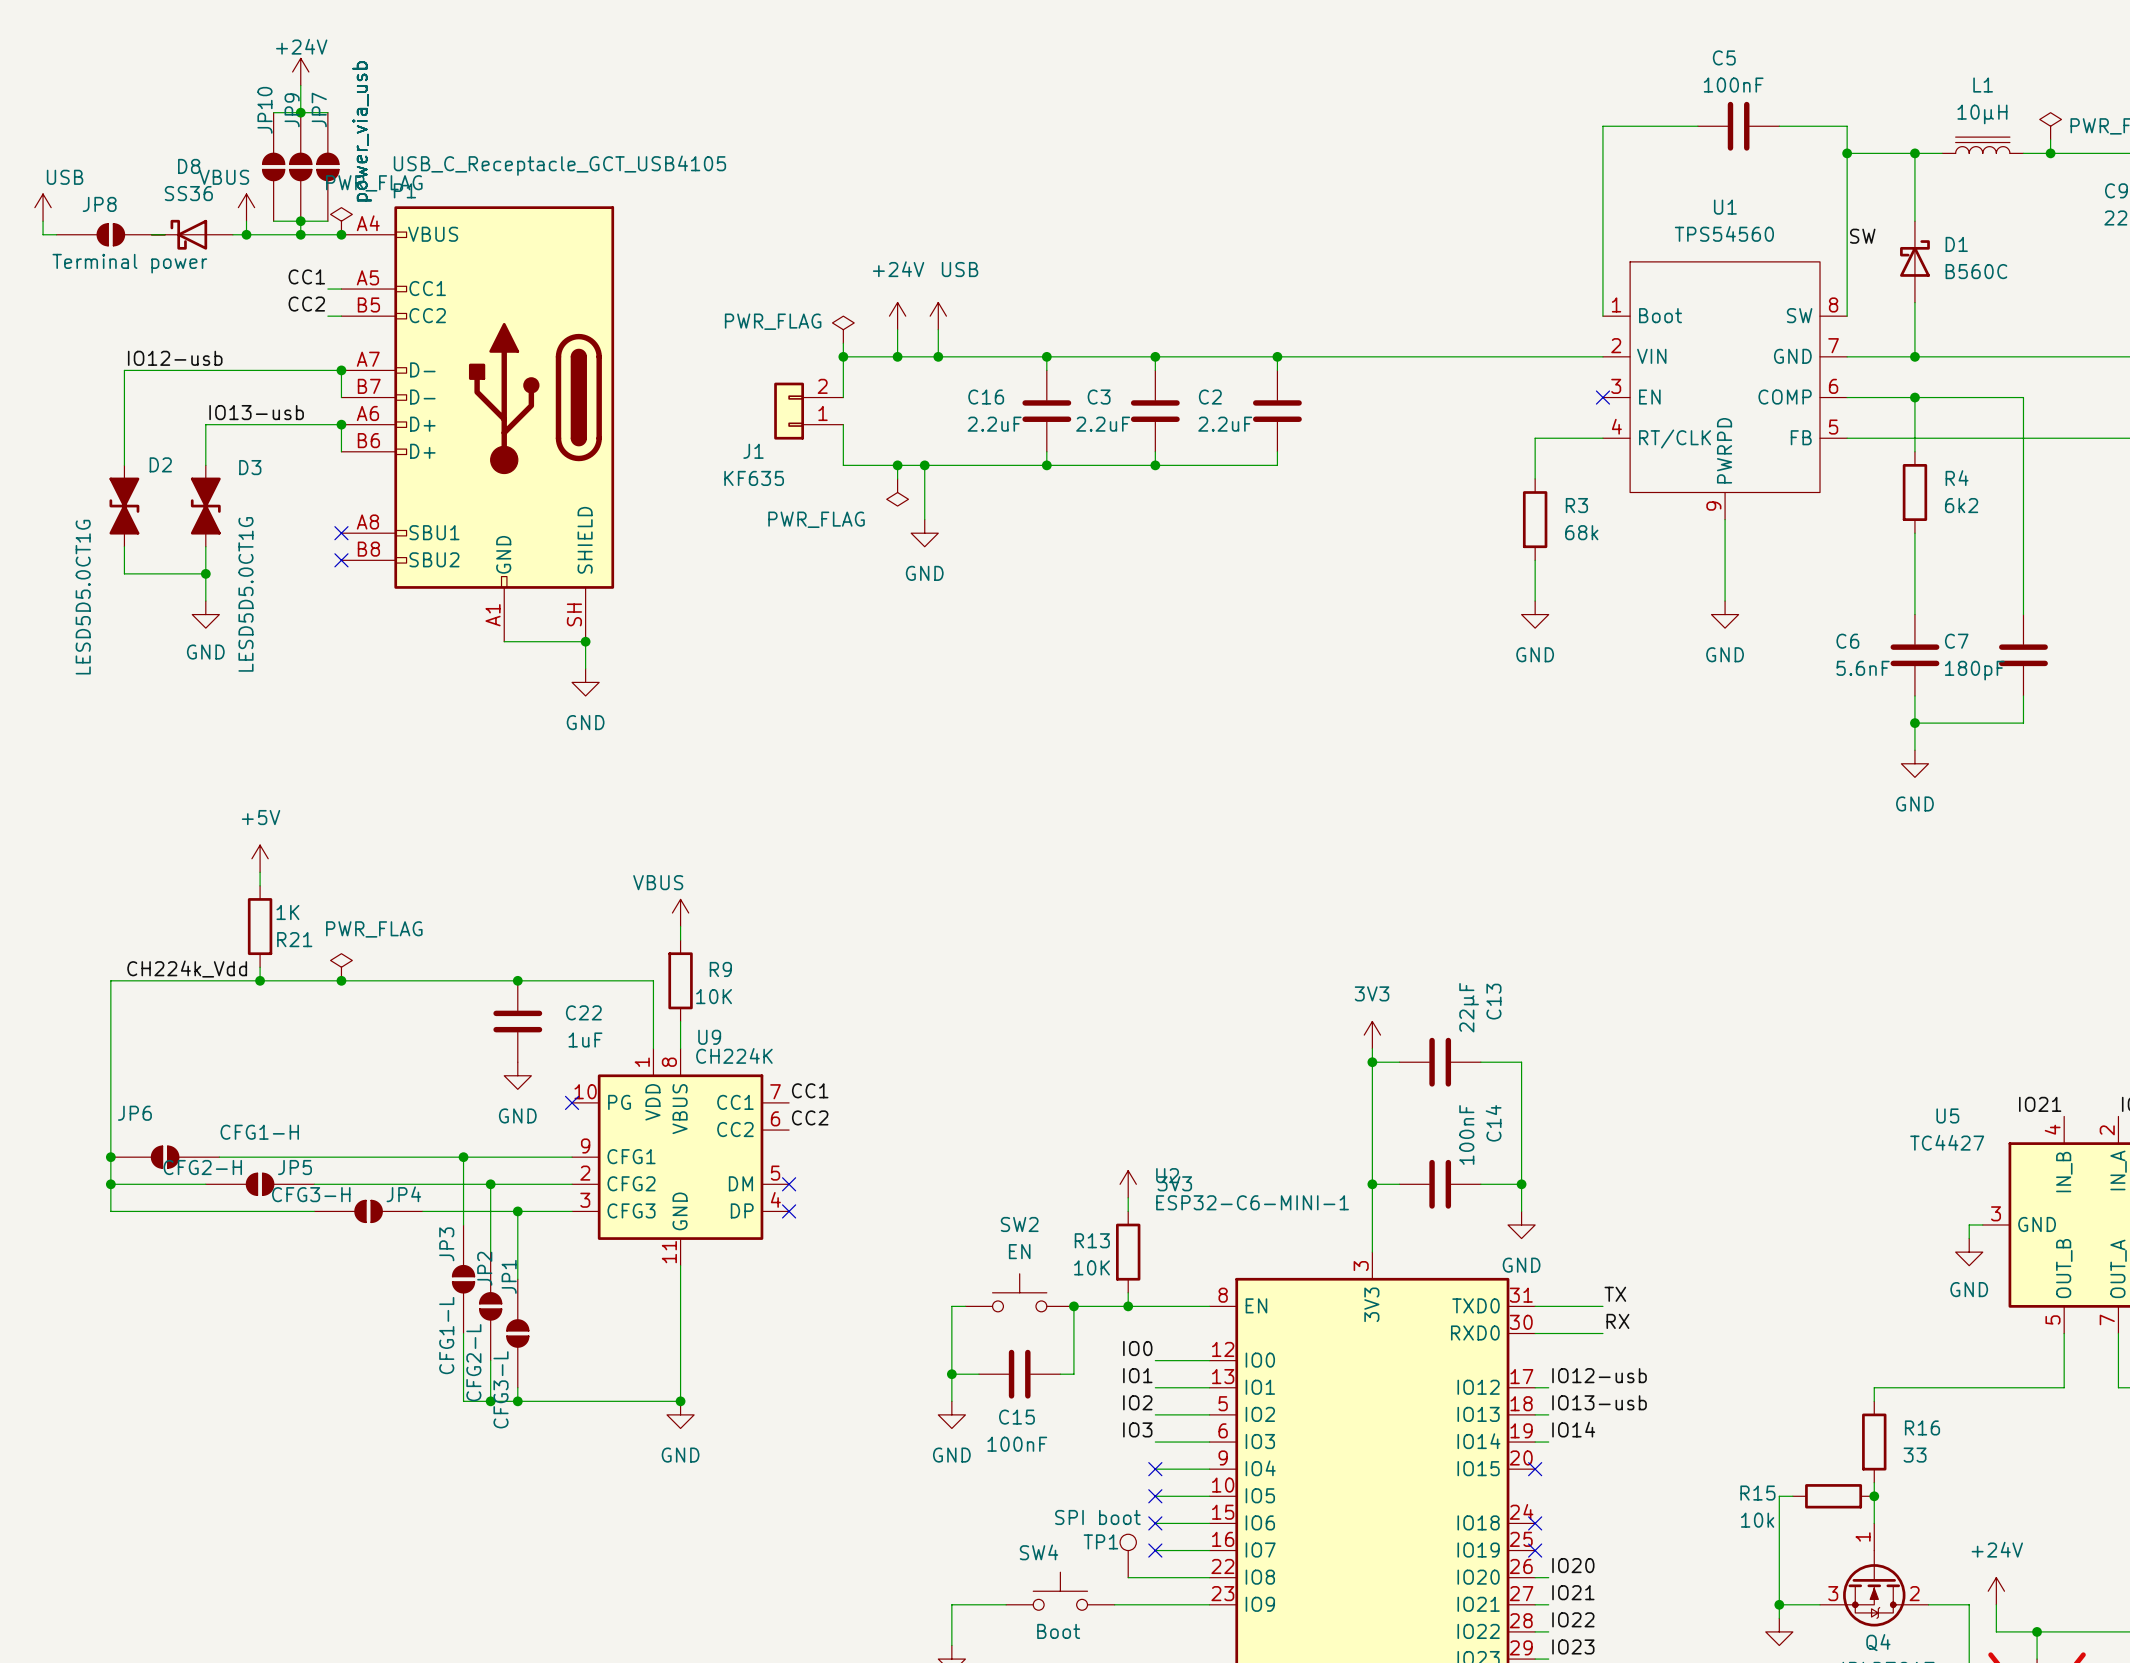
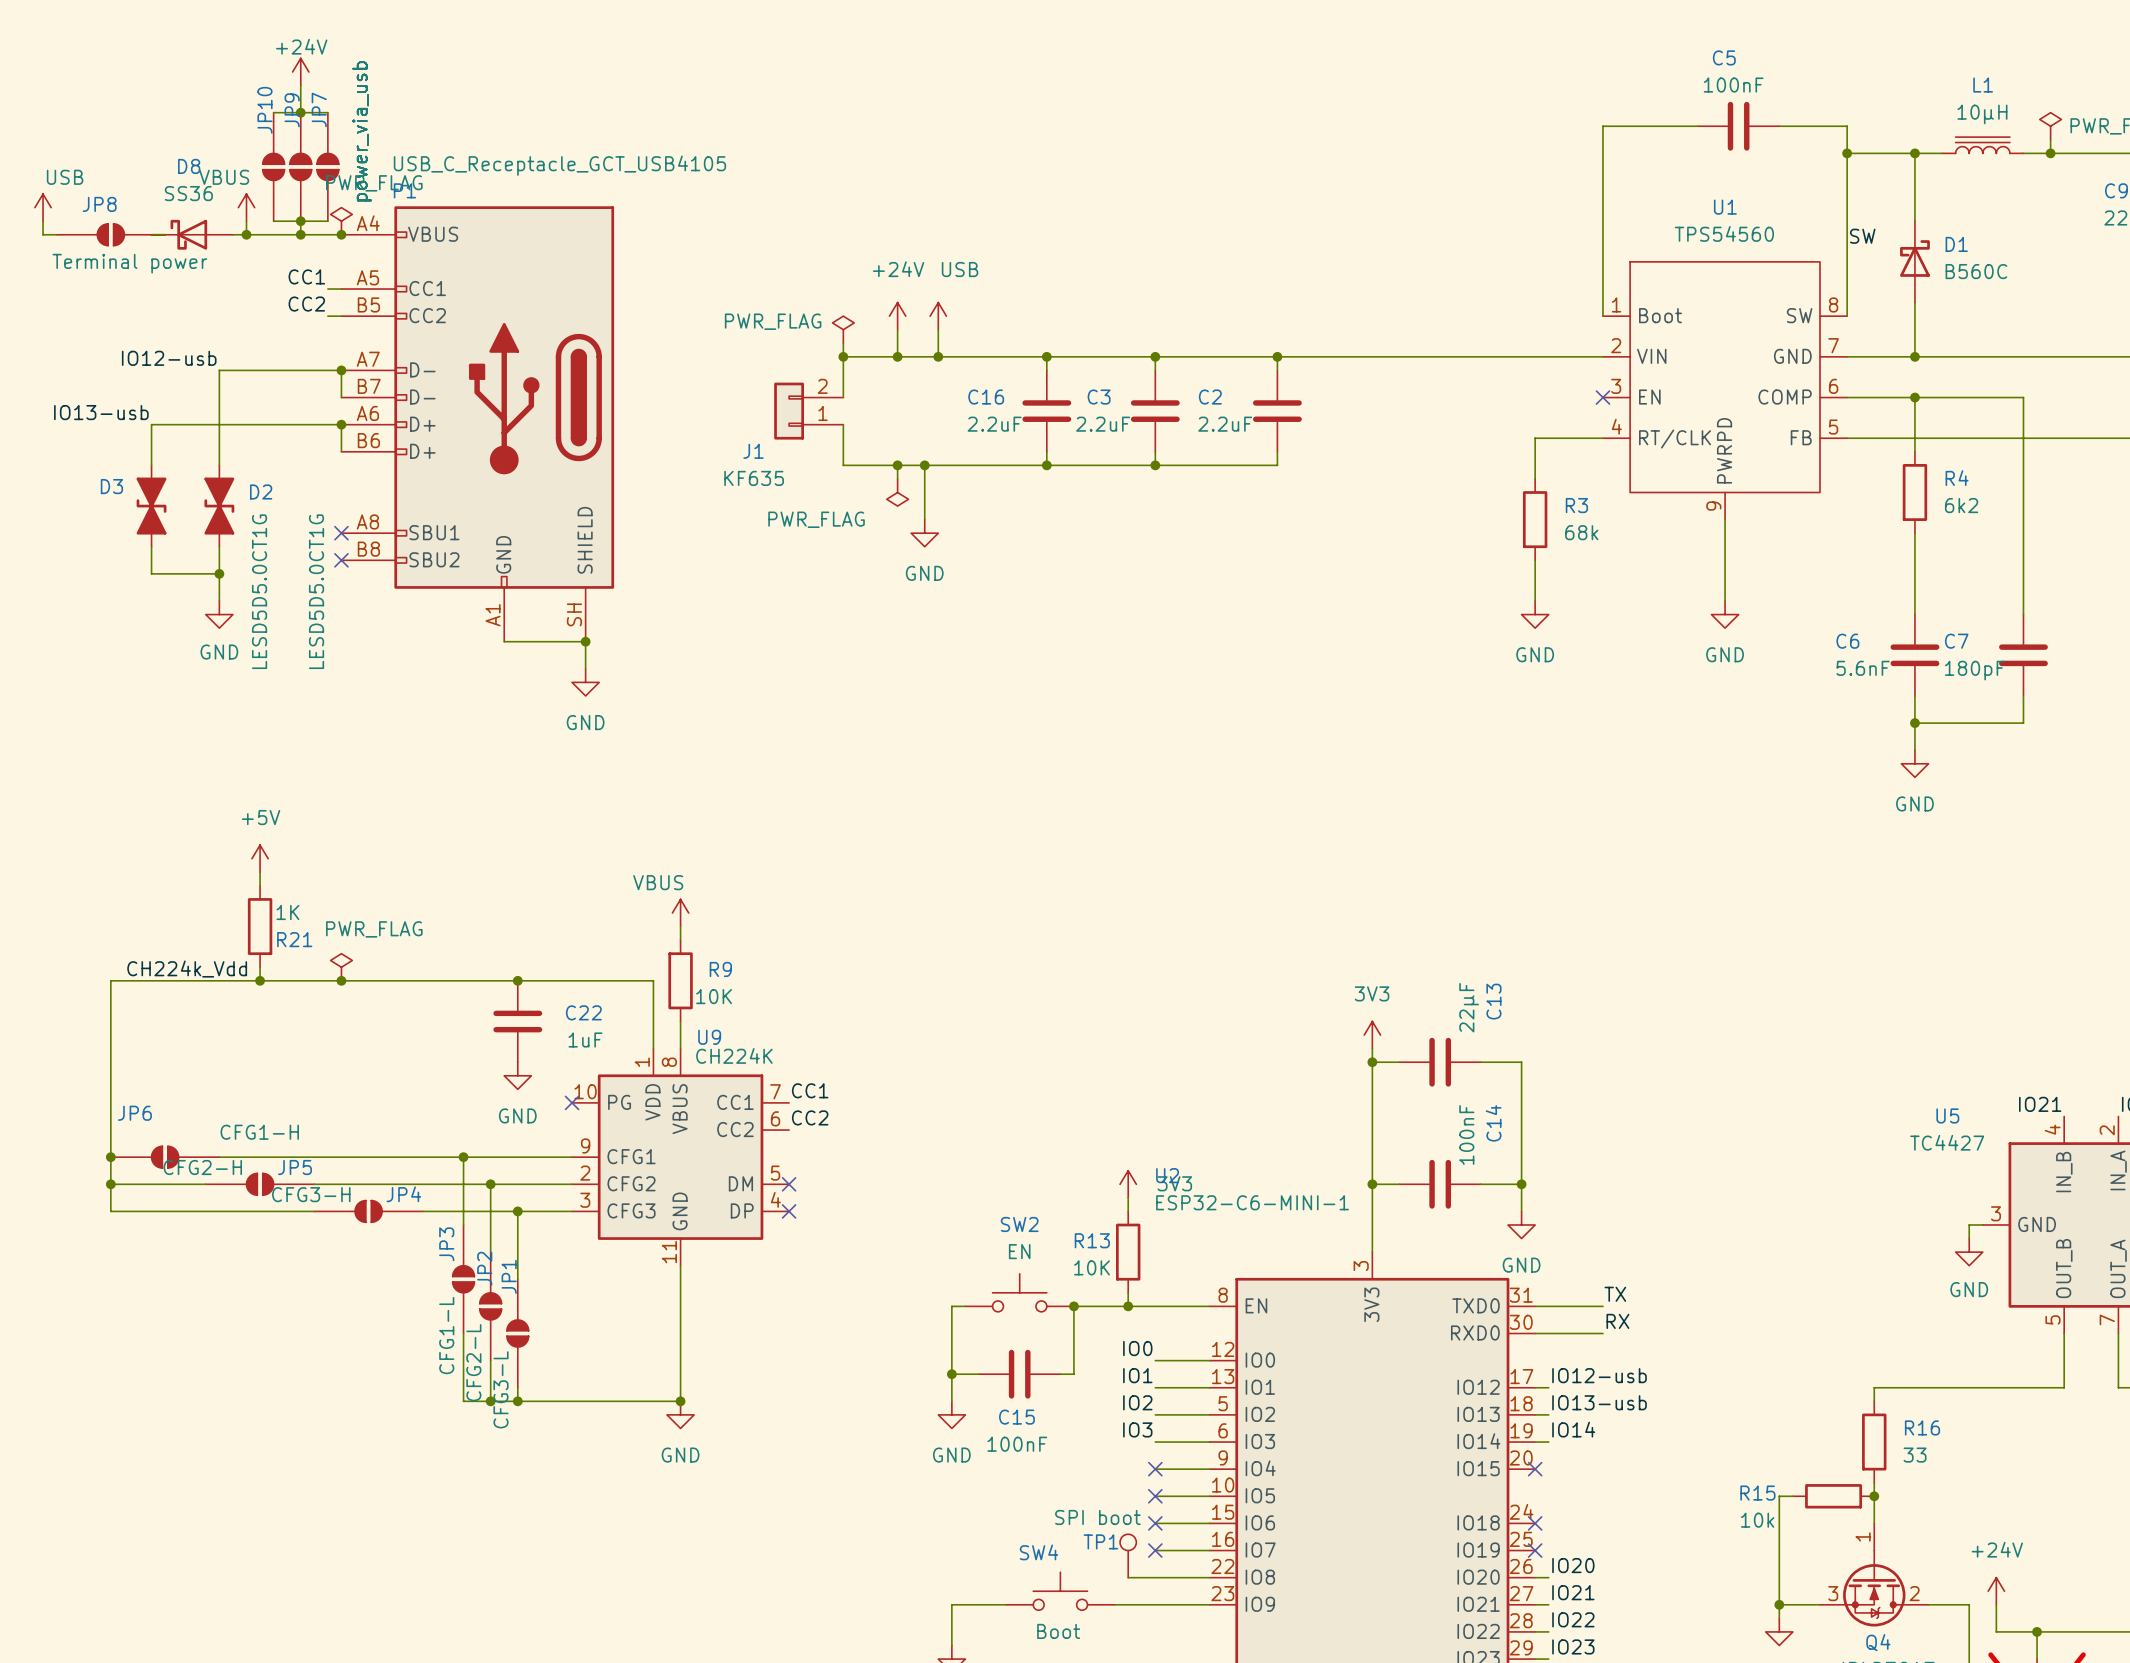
label position: IO12-usb (175, 358) -> IO12-usb (169, 358)
wire: (219, 370) (124, 370) (124, 465) -> (219, 370) (219, 465)
label position: IO13-usb (256, 412) -> IO13-usb (101, 412)
wire: (205, 424) (205, 465) -> (205, 424) (151, 424) (151, 465)
D2 name position: D2 (160, 464) -> D2 (261, 491)
D3 name position: D3 (250, 467) -> D3 (111, 486)
D2 position: (124, 506) -> (219, 506)
D3 position: (205, 506) -> (151, 506)
wire: (124, 546) (124, 573) (151, 573) -> (151, 546) (151, 573)
wire: (205, 546) (205, 601) -> (219, 546) (219, 601)
wire: none -> (205, 573) (219, 573)
junction position: (205, 573) -> (219, 573)
D3 value position: LESD5D5.0CT1G (245, 594) -> LESD5D5.0CT1G (316, 591)
D2 value position: LESD5D5.0CT1G (83, 597) -> LESD5D5.0CT1G (259, 591)
power symbol position: GND (205, 614) -> GND (219, 614)

